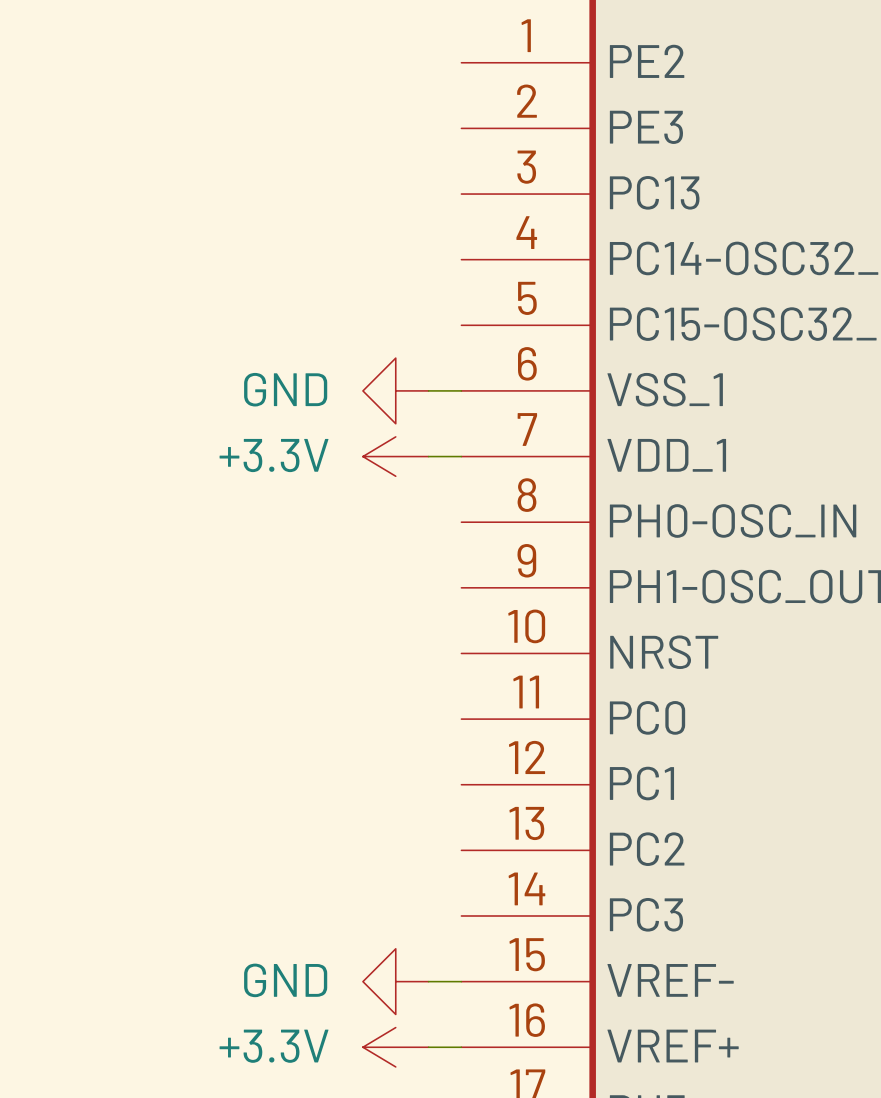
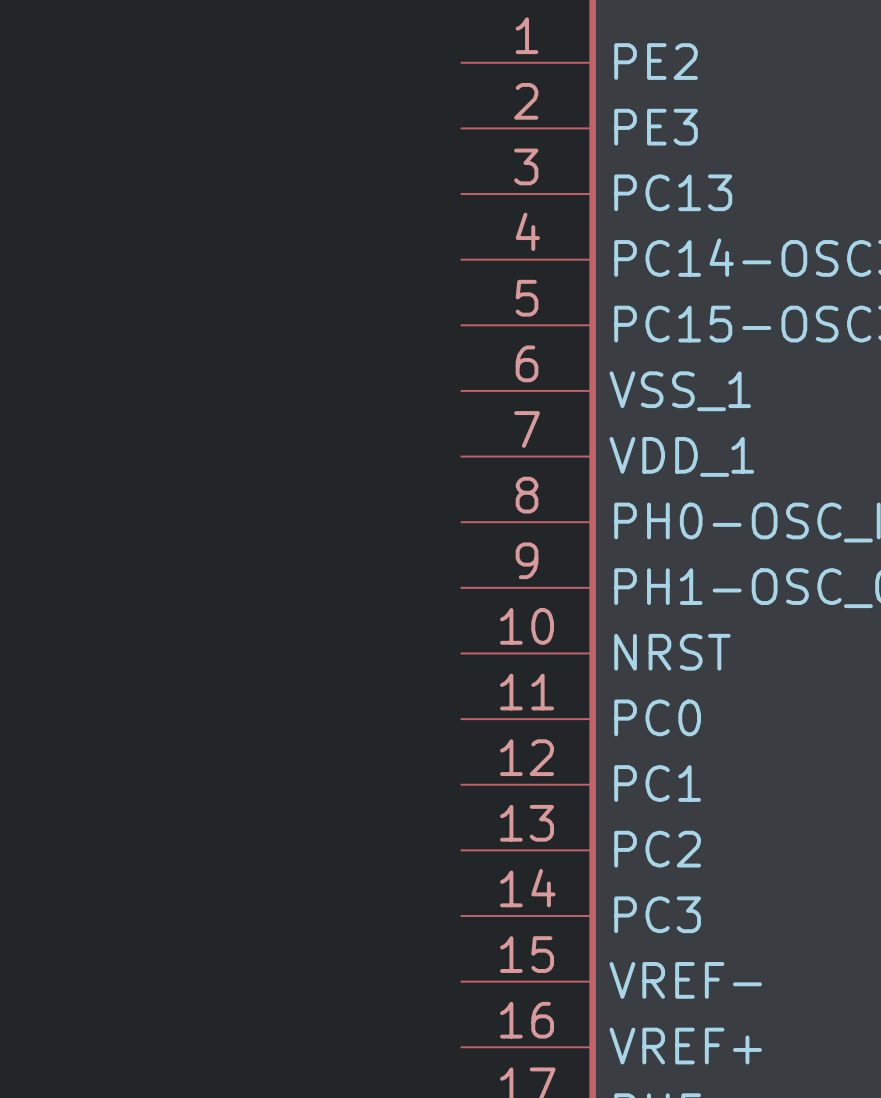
power symbol: GND (395, 390) -> none
wire: (428, 390) (461, 390) -> none
power symbol: +3.3V (395, 456) -> none
wire: (428, 456) (461, 456) -> none
power symbol: GND (395, 981) -> none
wire: (428, 981) (461, 981) -> none
power symbol: +3.3V (395, 1047) -> none
wire: (428, 1047) (461, 1047) -> none

